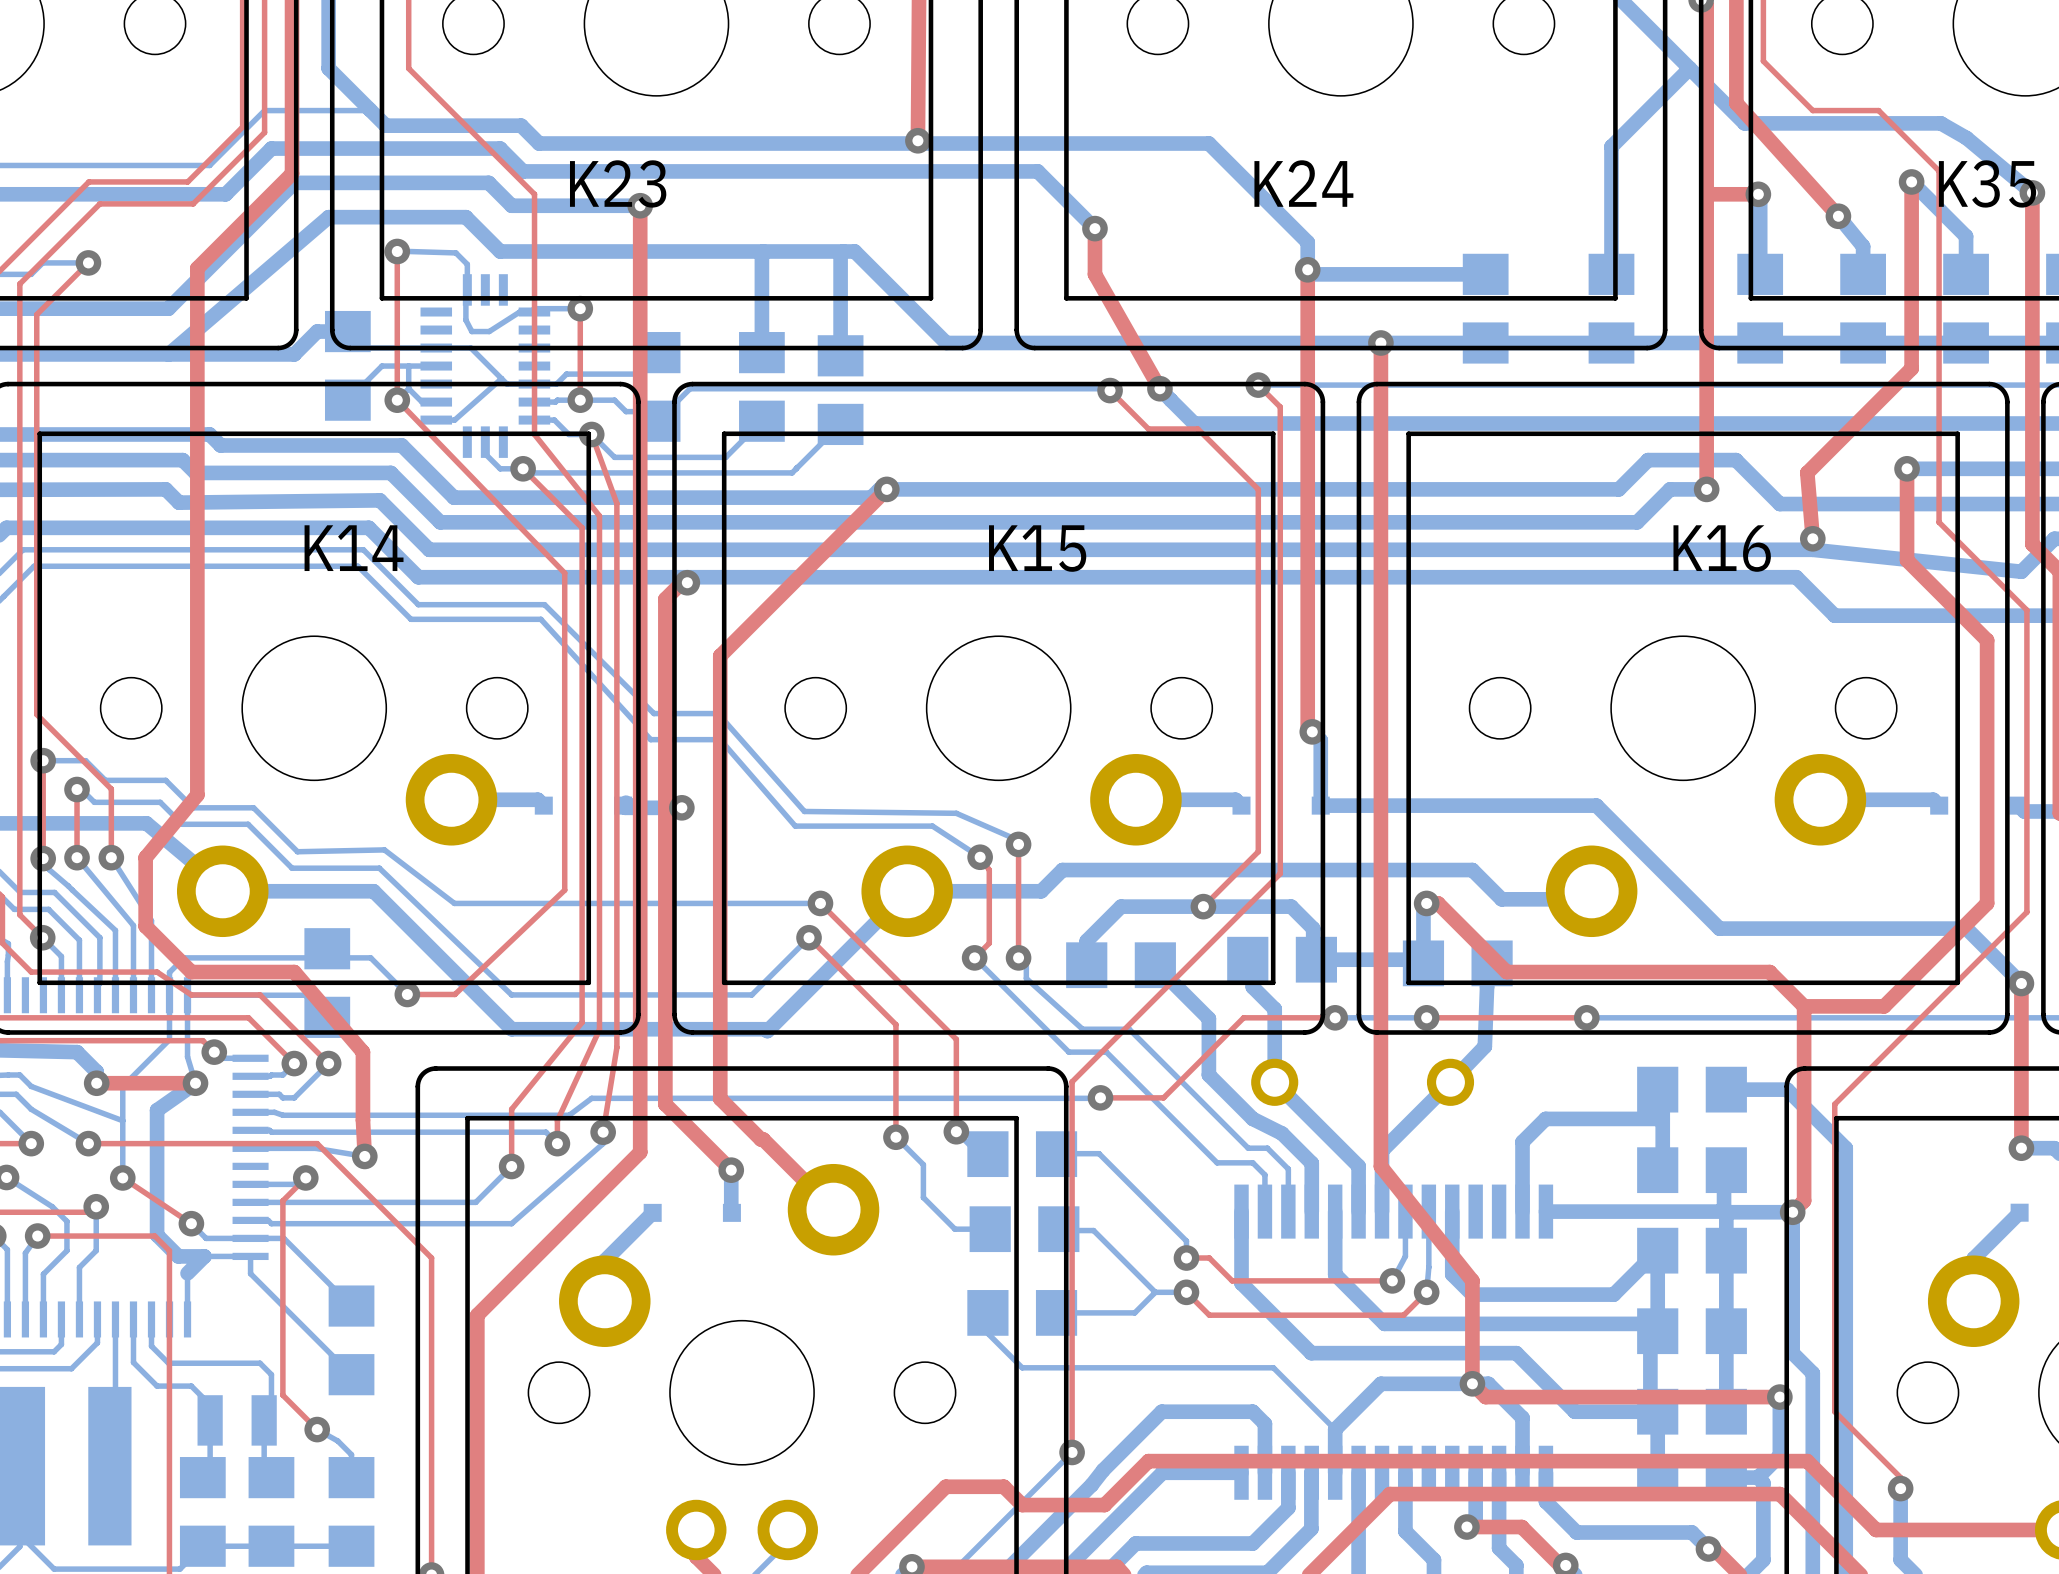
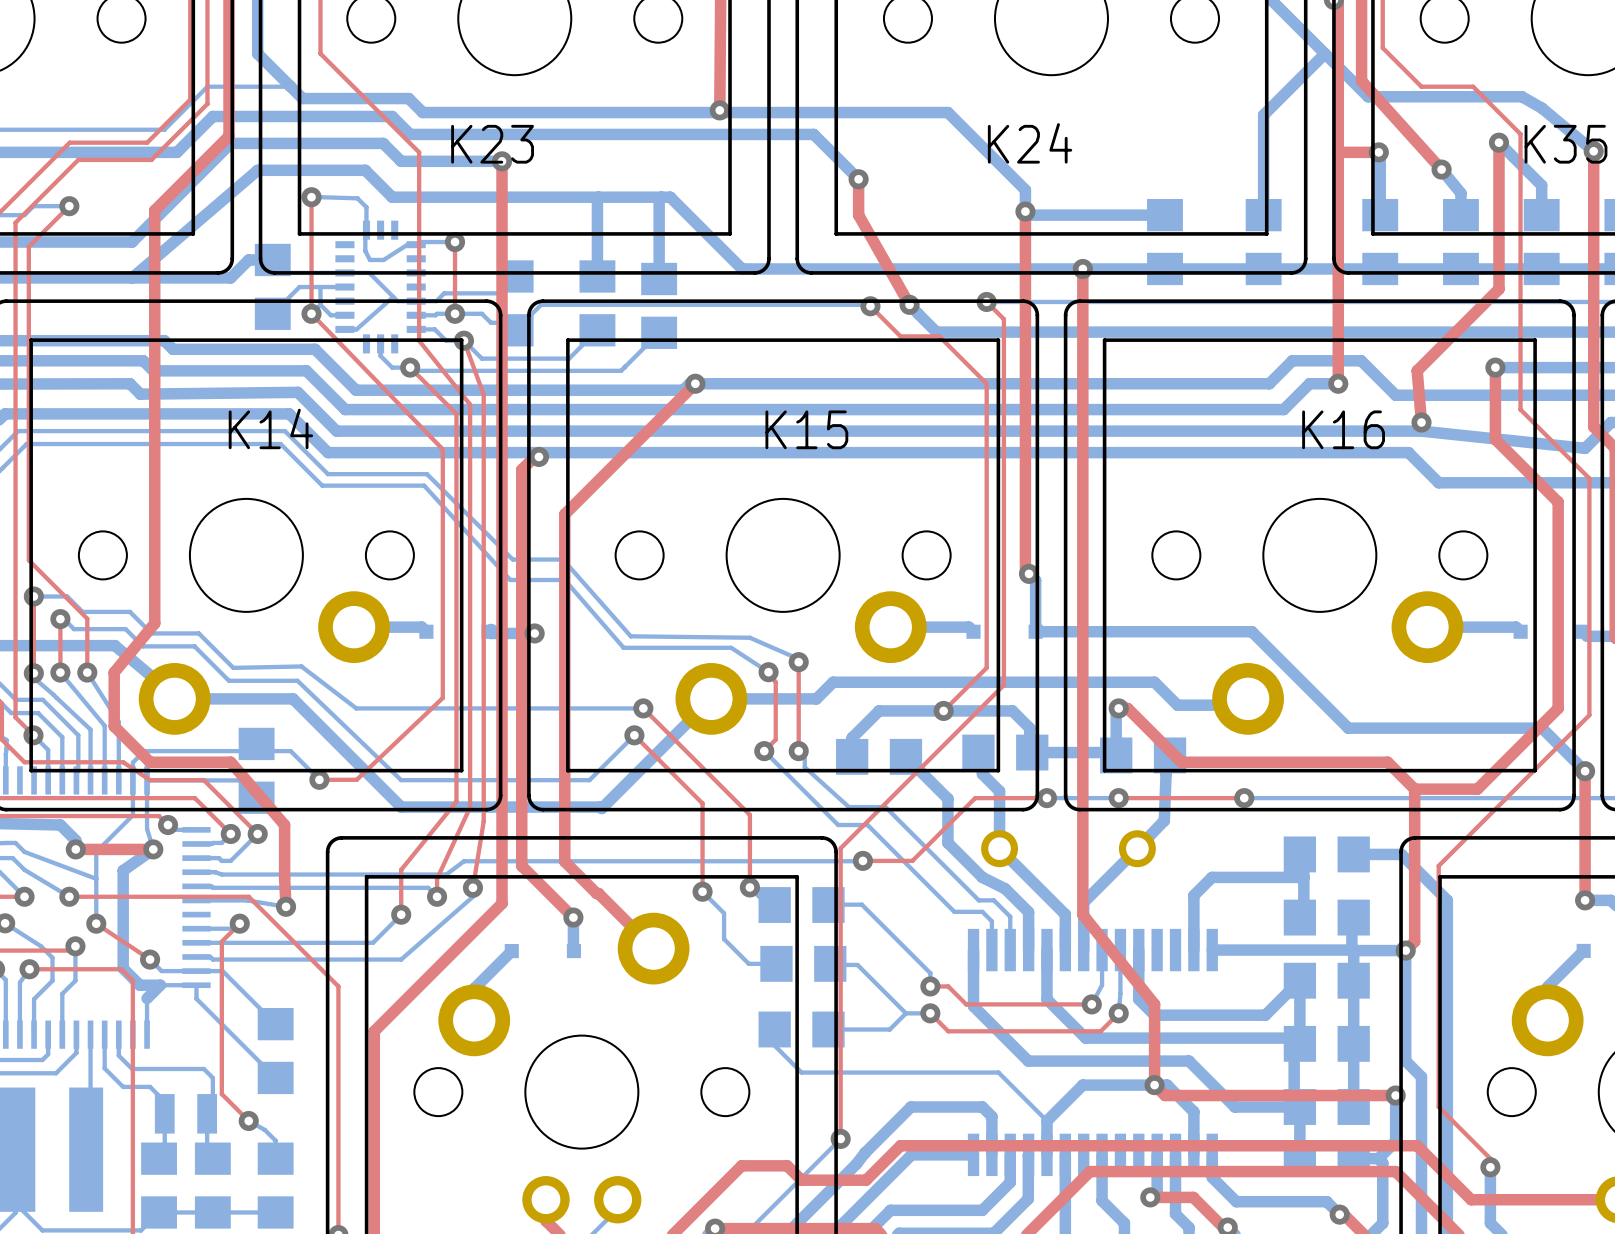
part footprint: [420, 274, 551, 458] -> [335, 220, 426, 354]

